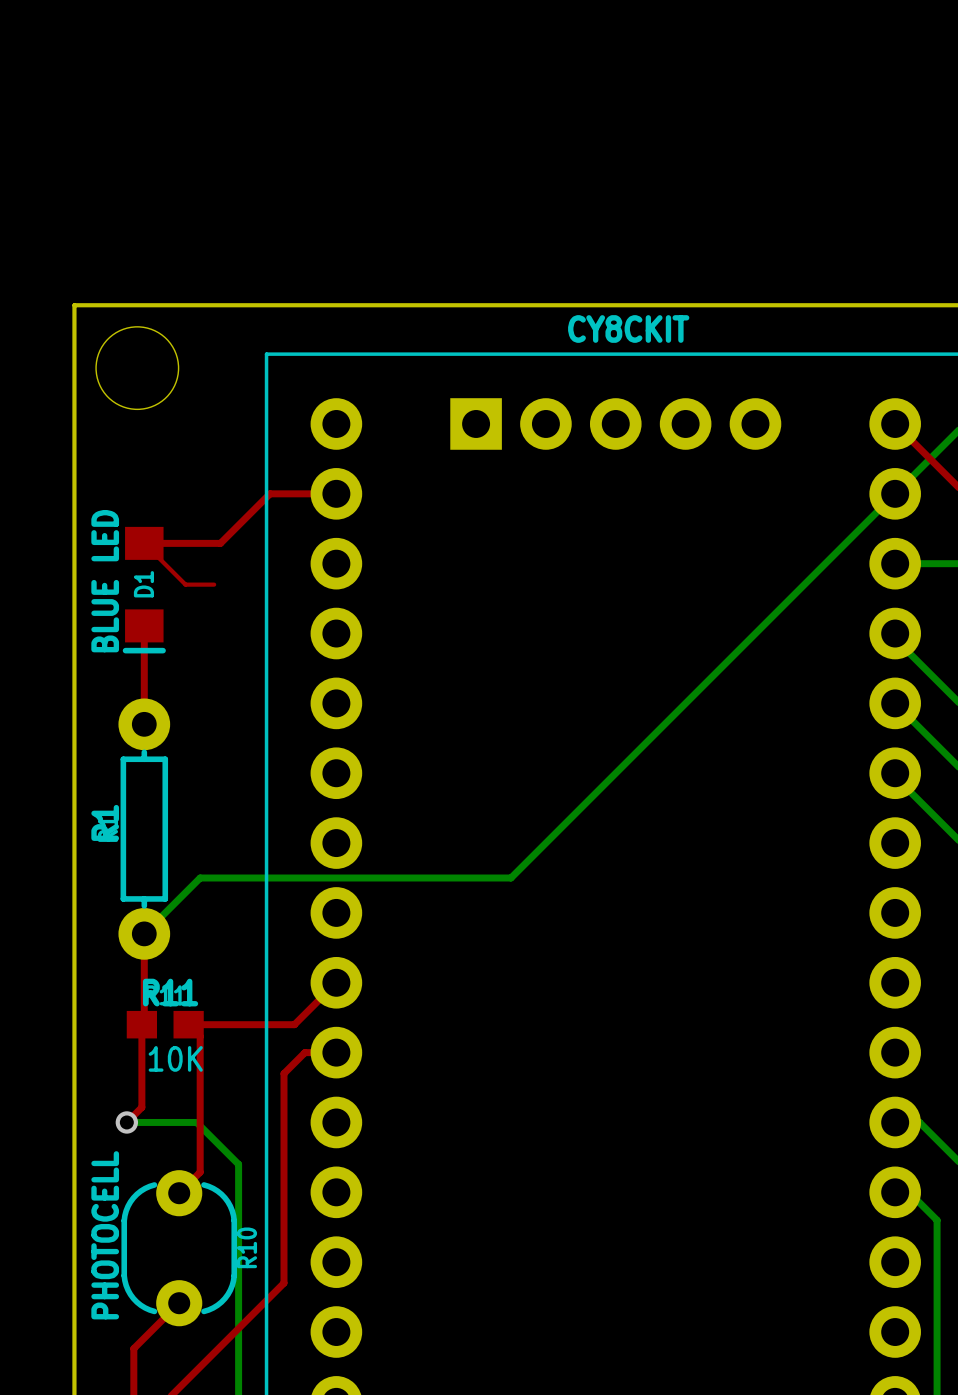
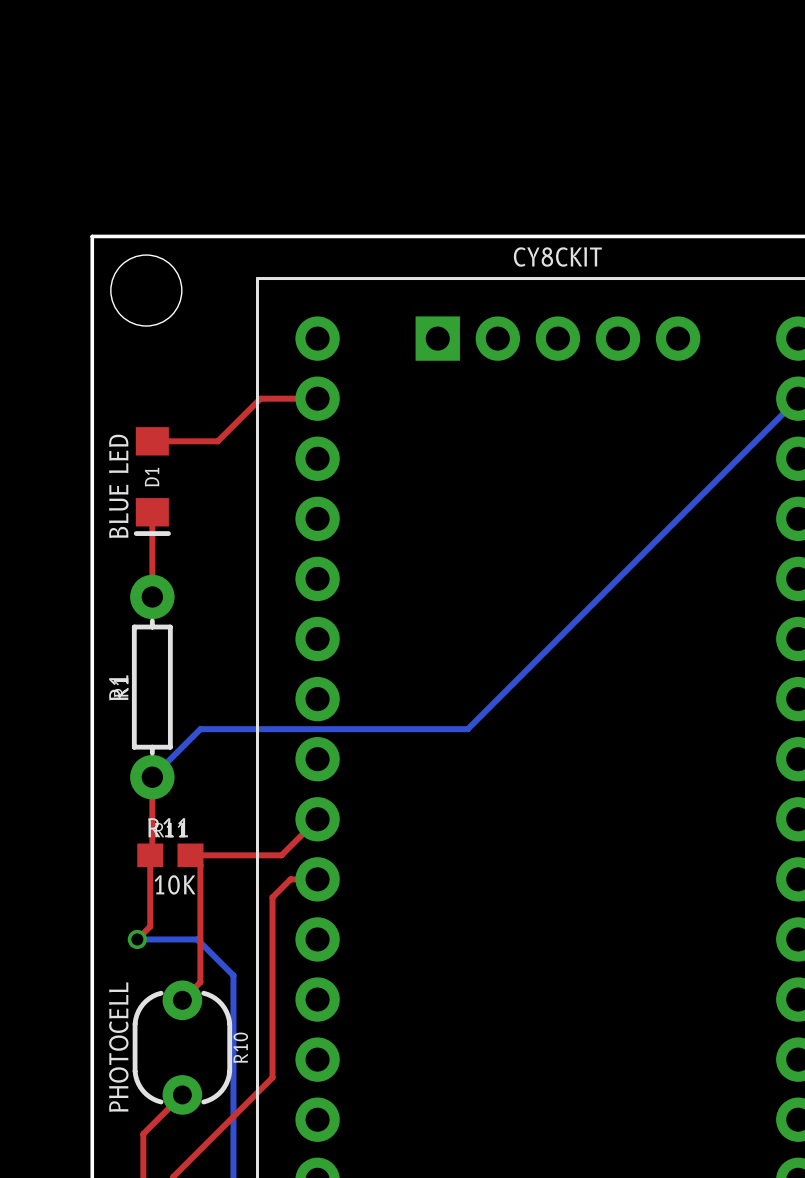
top track: (144, 543) (185, 584) (214, 584) -> none

